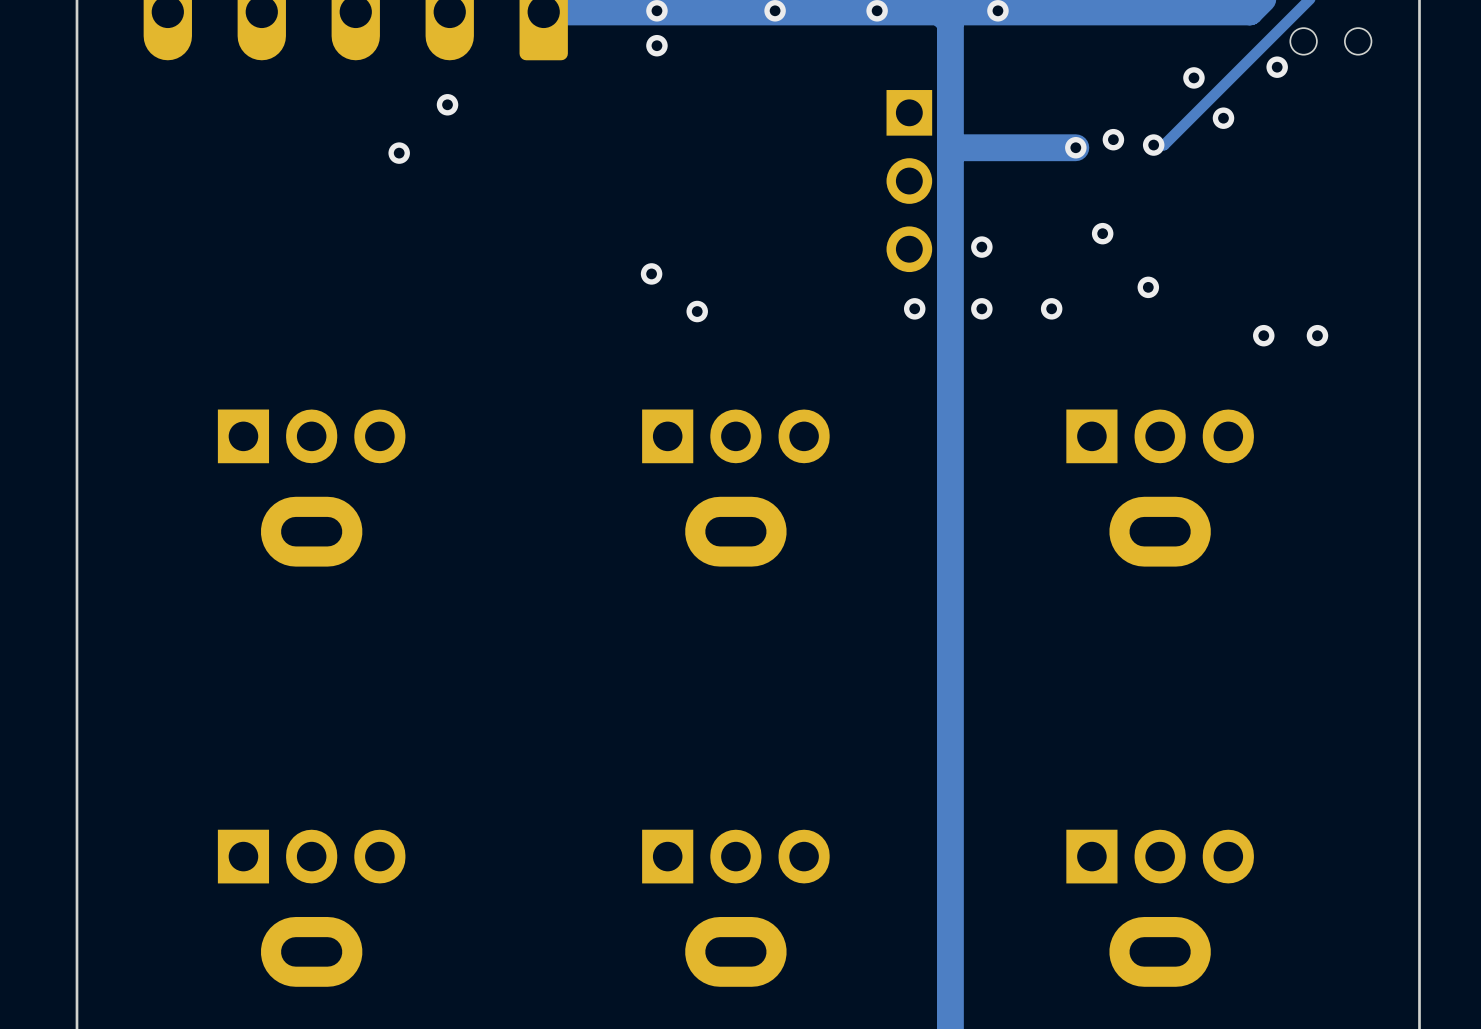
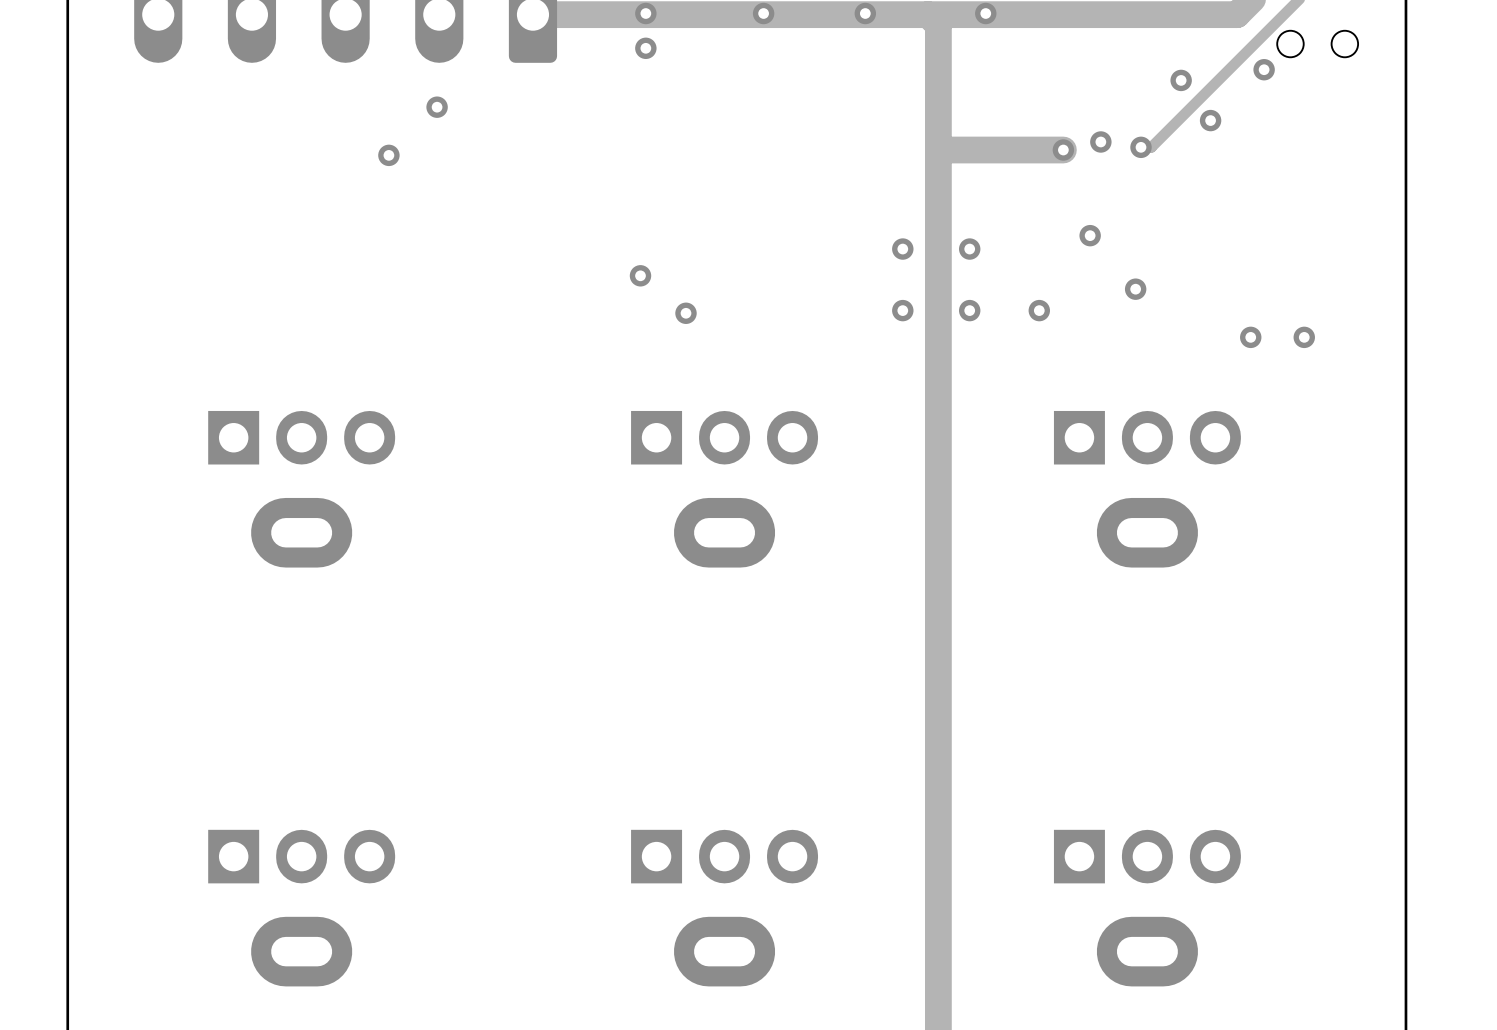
part: (909, 181) -> none
via: none -> (902, 249)

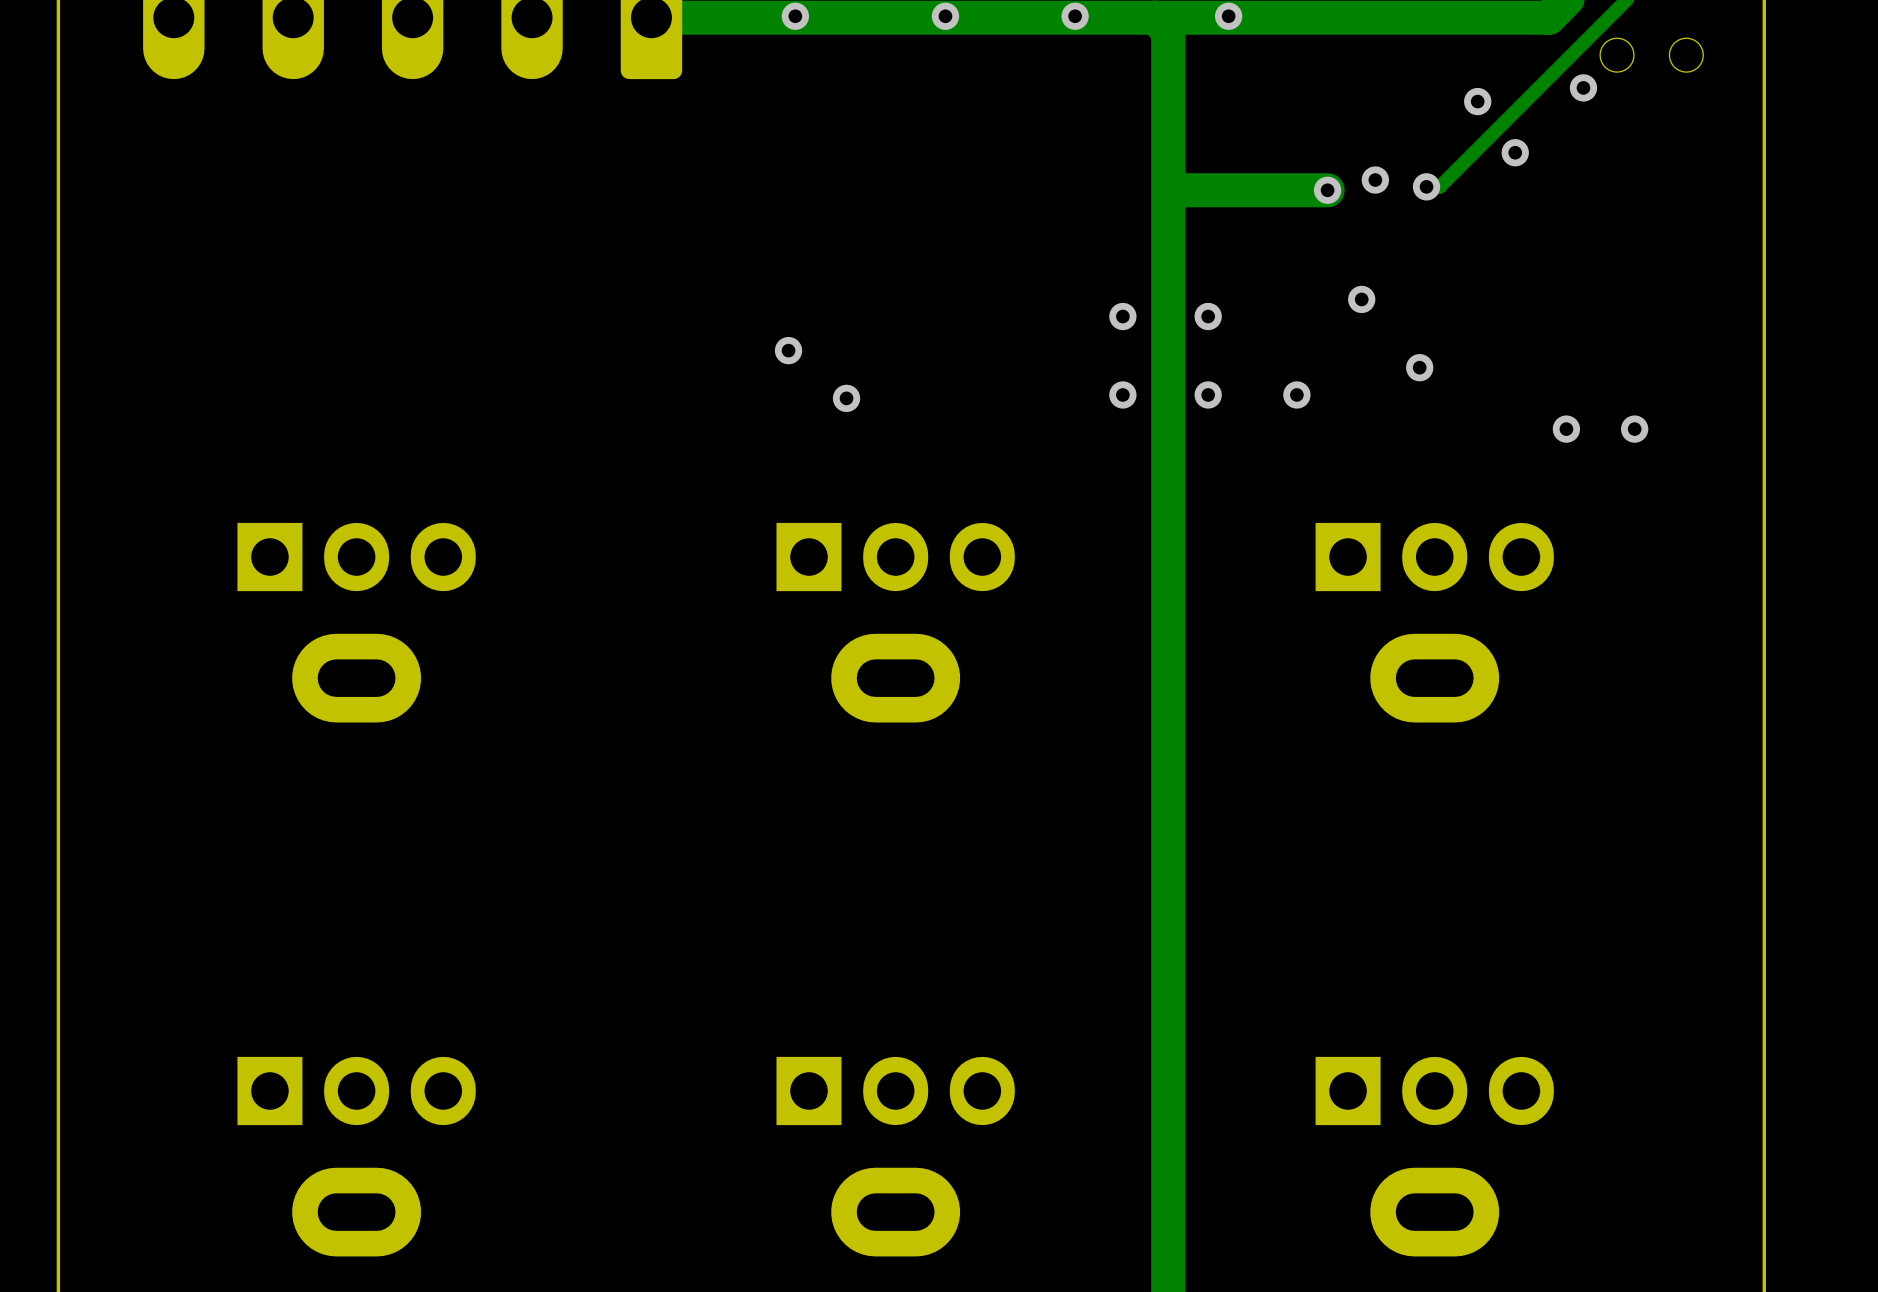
via: (645, 48) -> none
via: (437, 107) -> none
via: (388, 155) -> none

